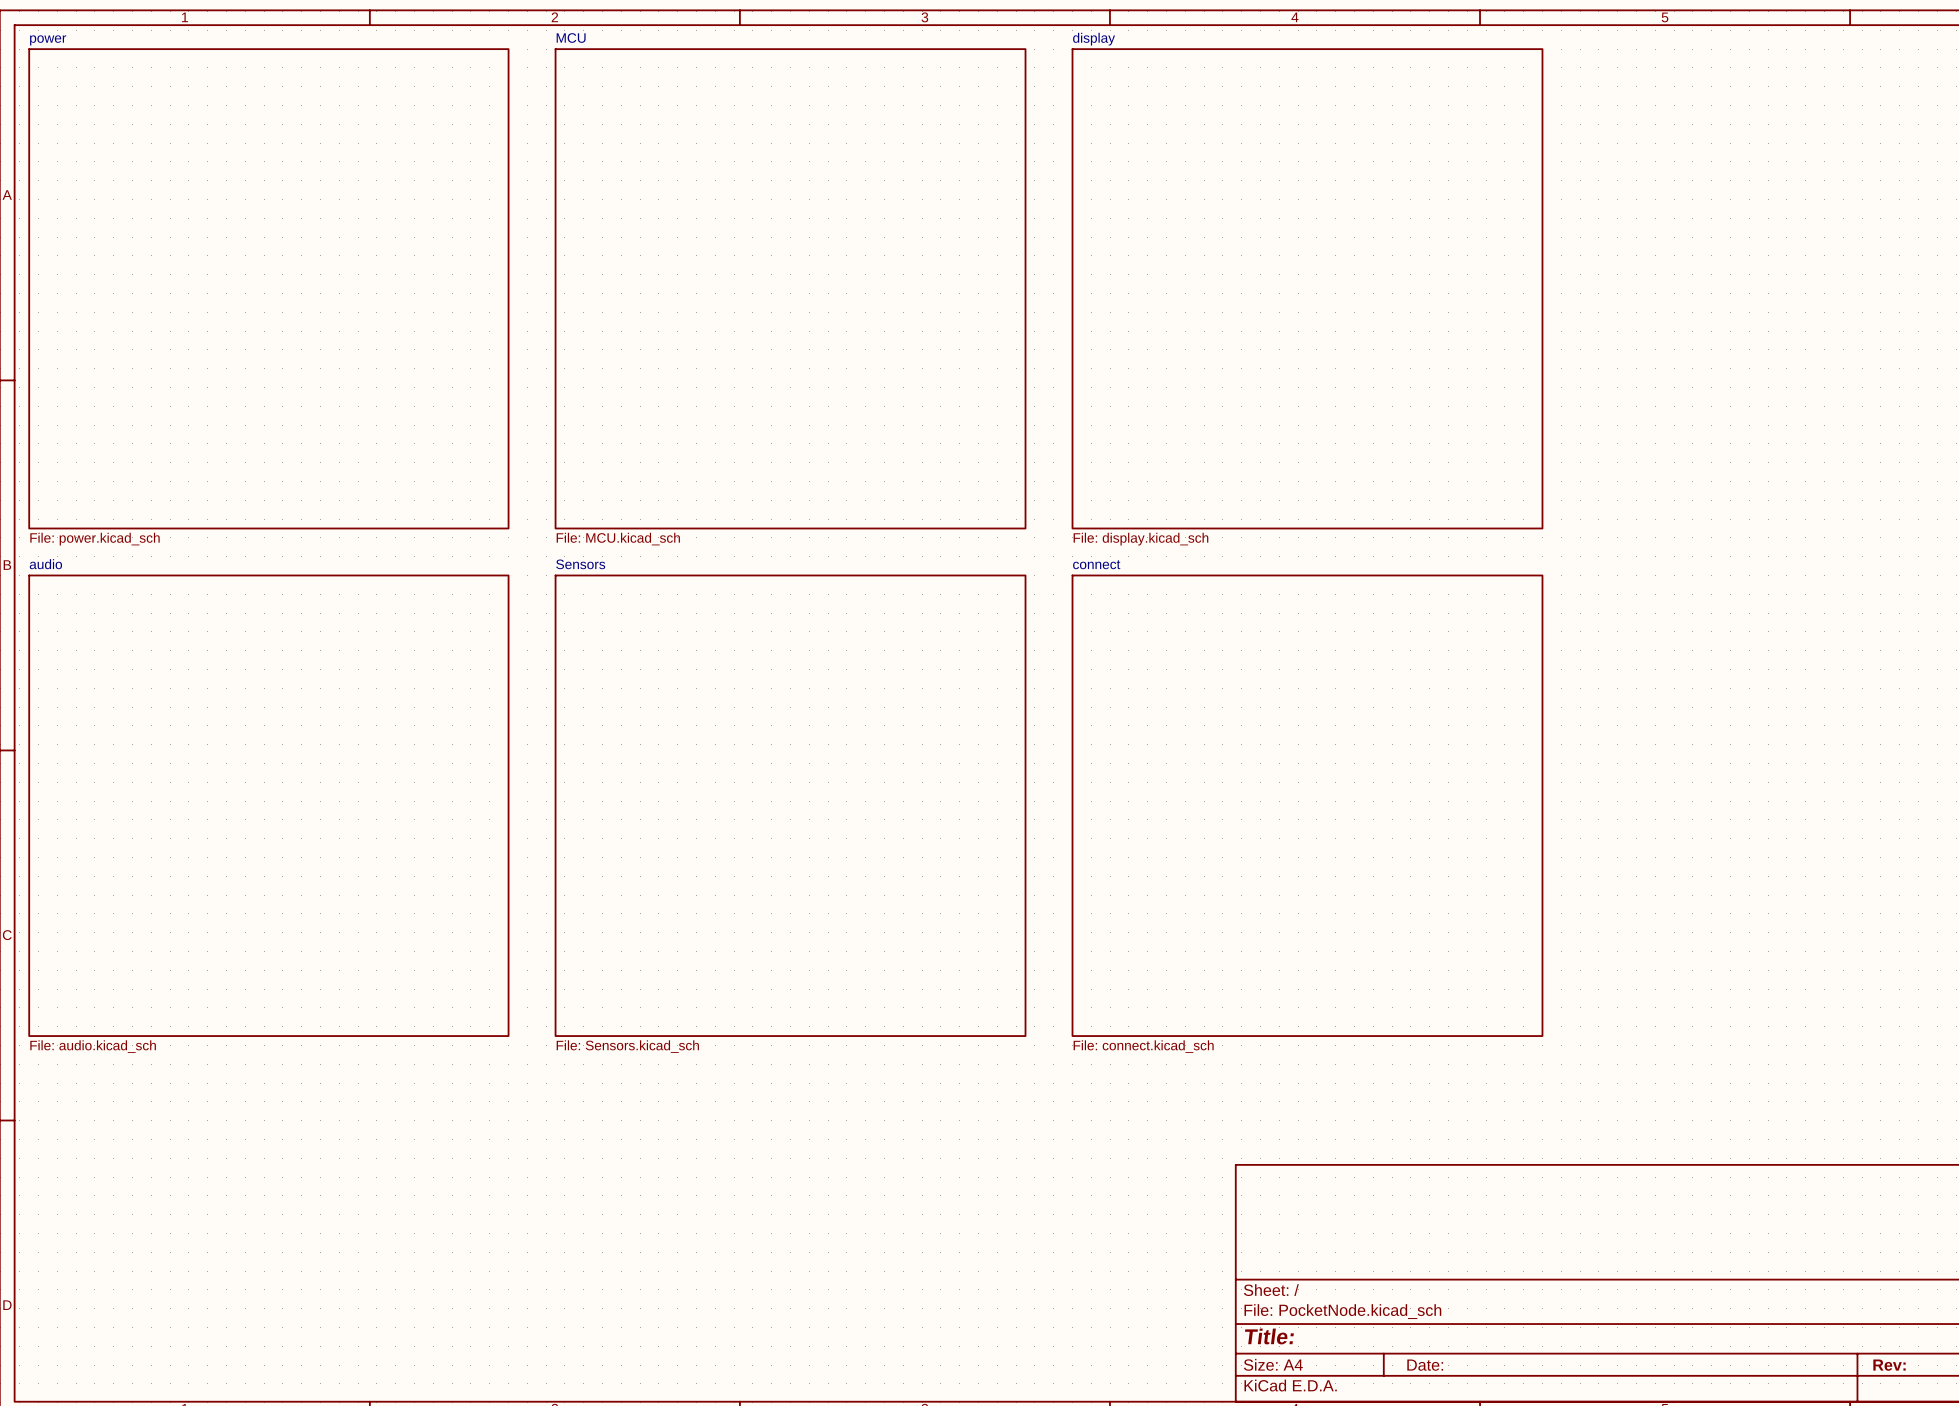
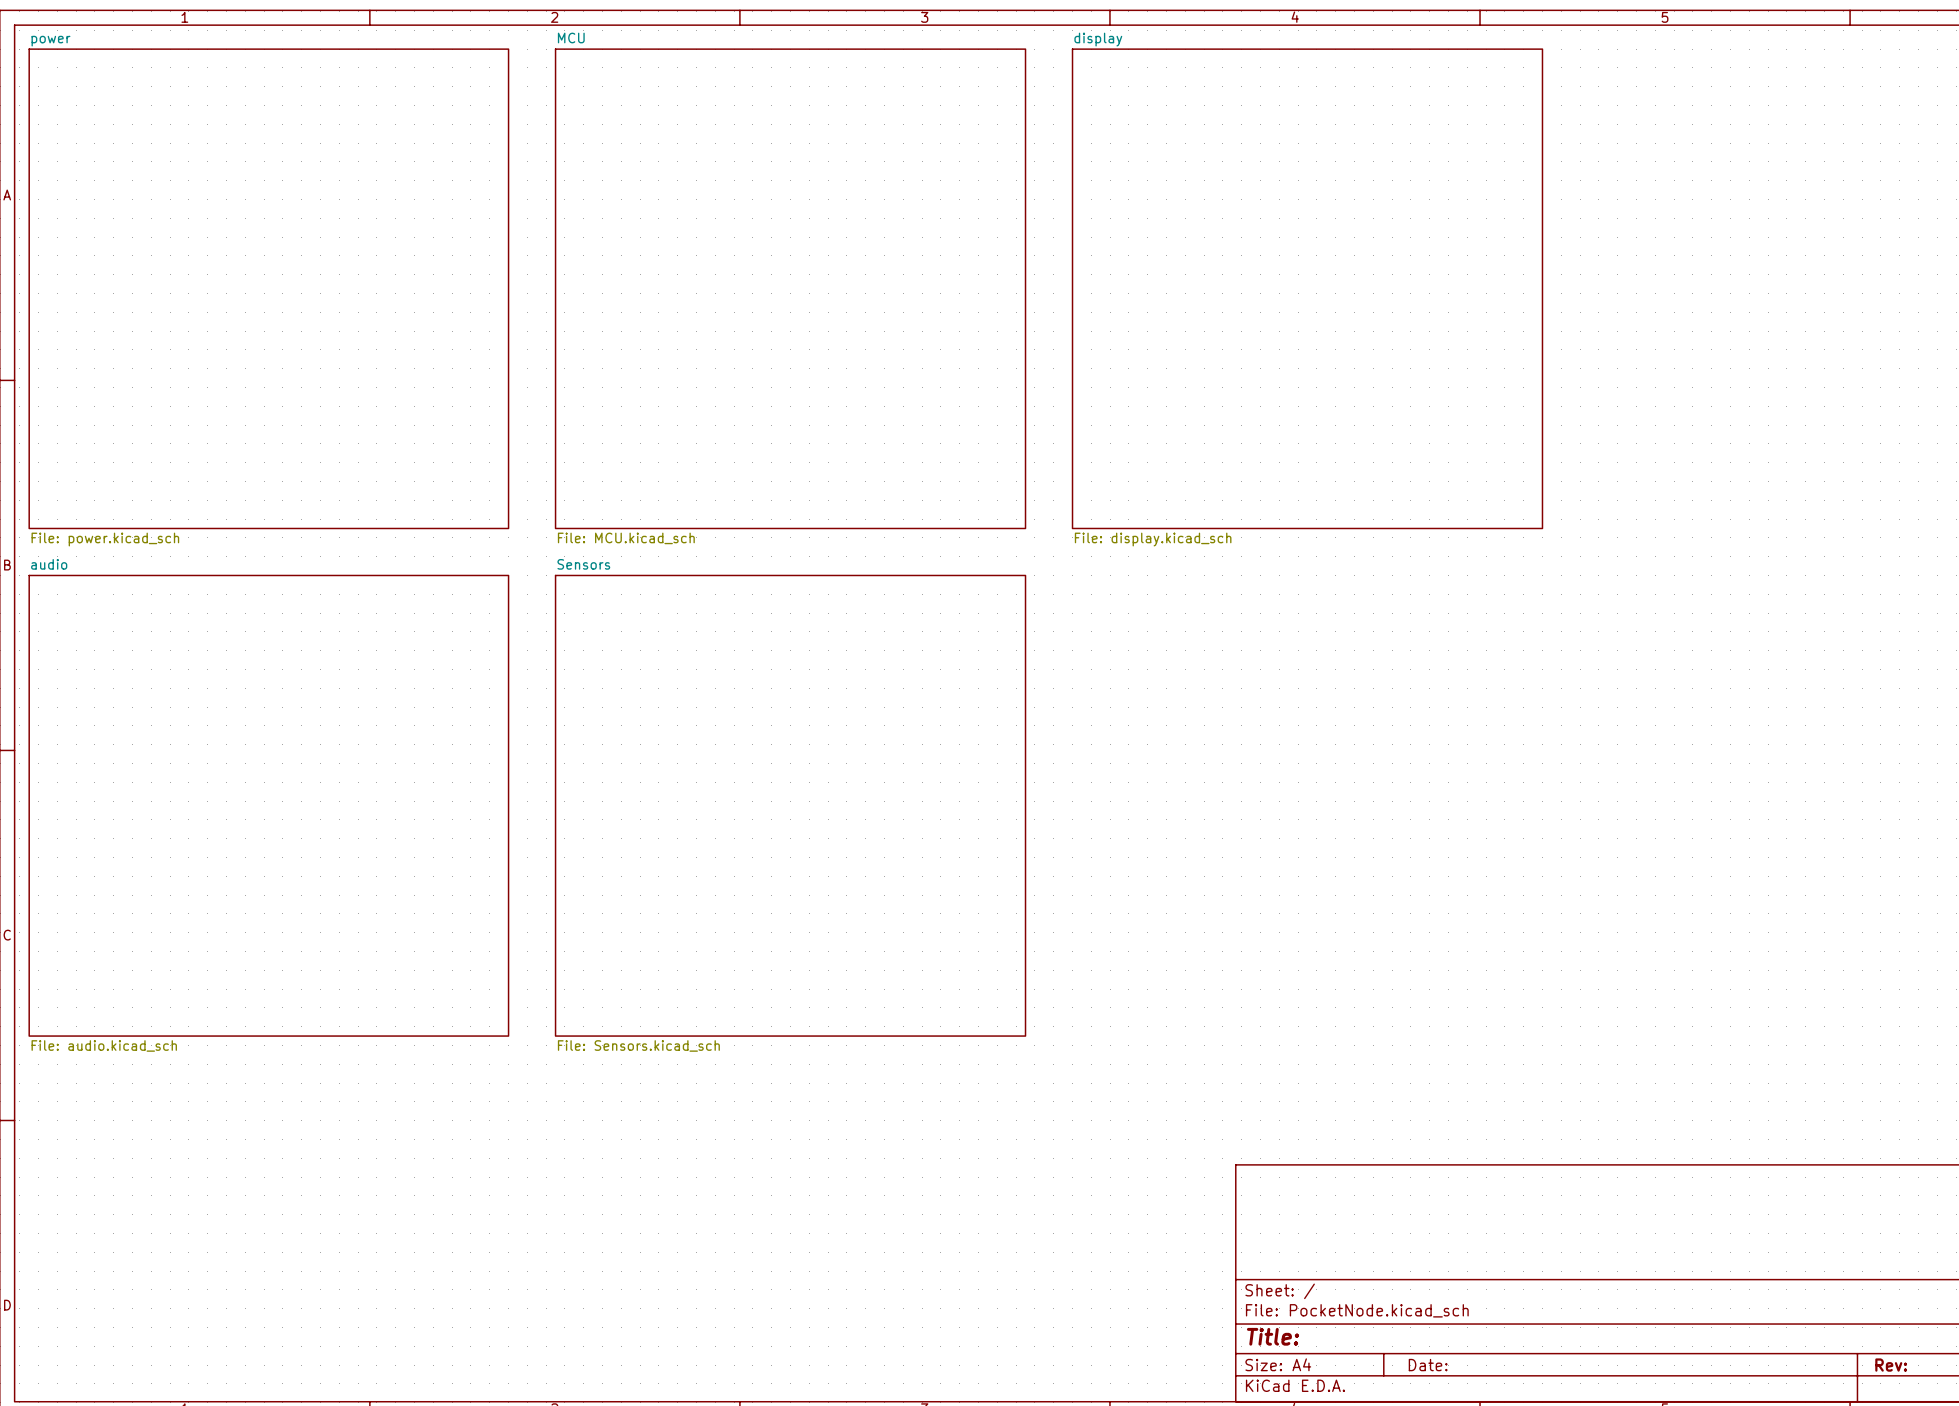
sheet connect: File: connect.kicad_sch (1307, 805) -> none

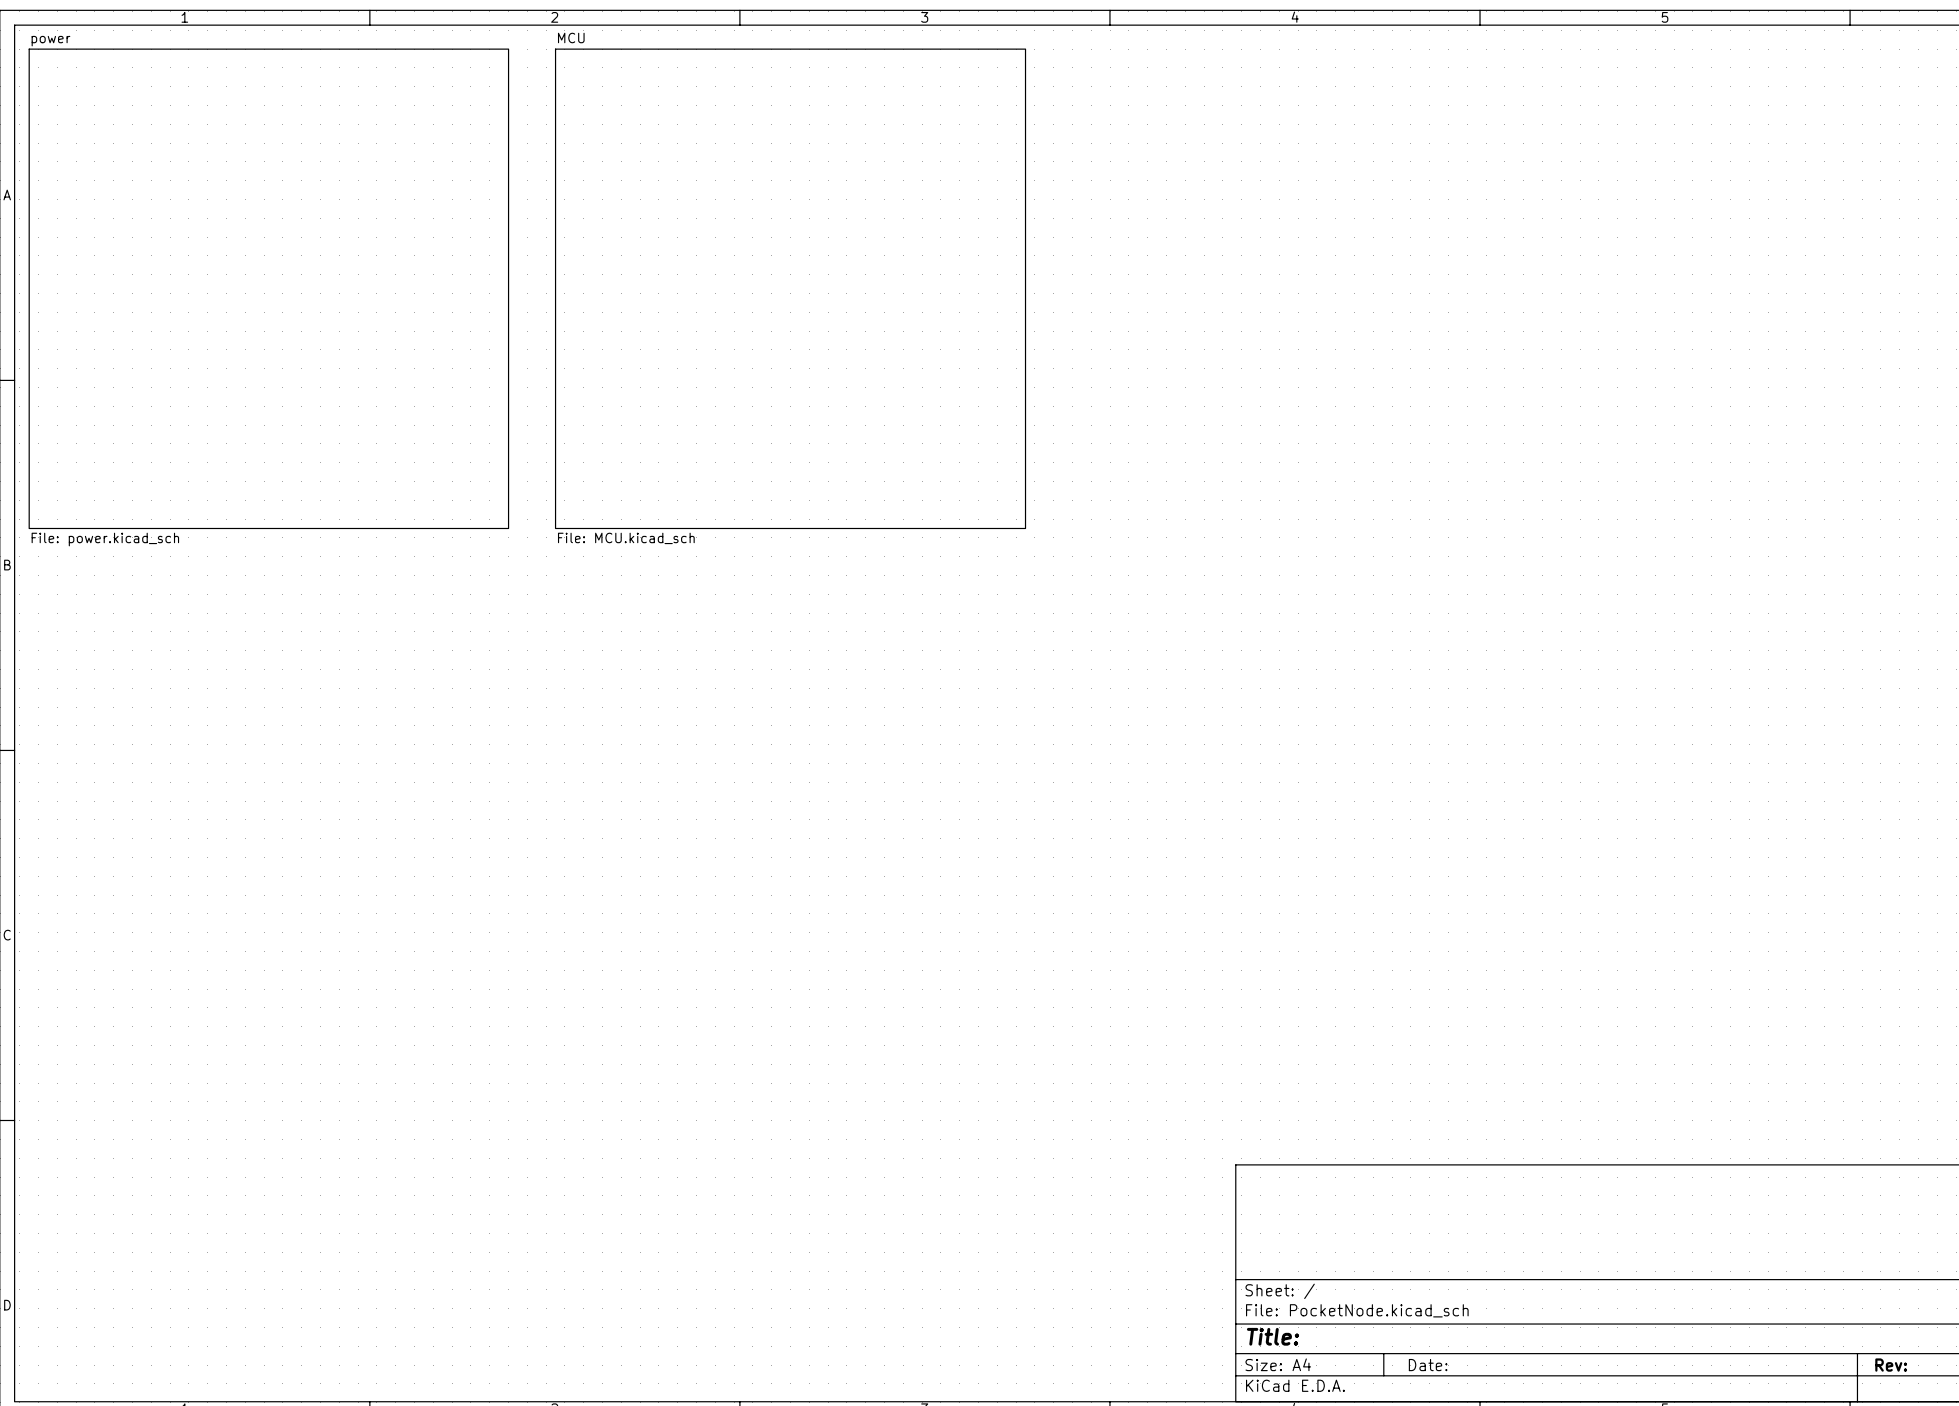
sheet display: File: display.kicad_sch (1307, 288) -> none
sheet audio: File: audio.kicad_sch (268, 805) -> none
sheet Sensors: File: Sensors.kicad_sch (790, 805) -> none

